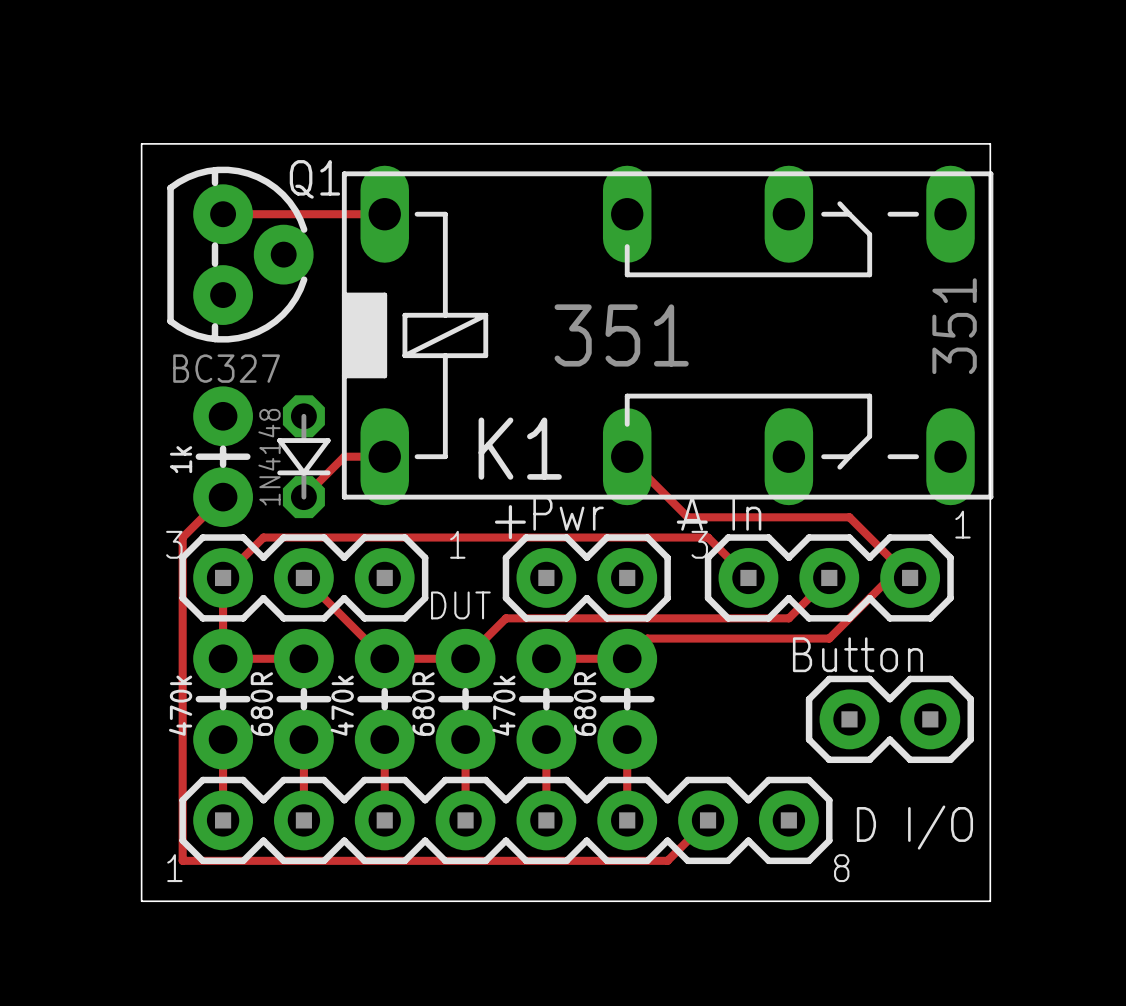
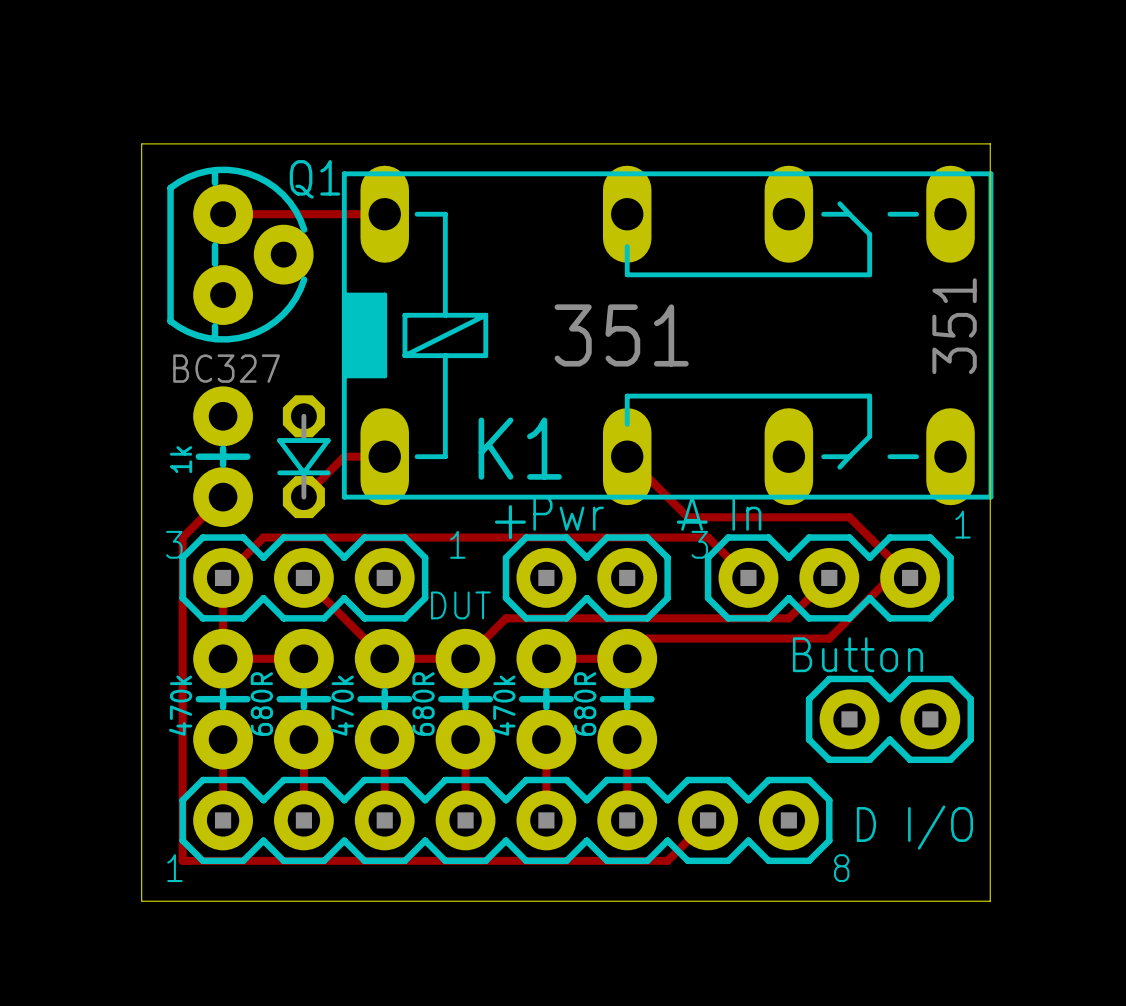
part value: 1N4148 (269, 457) -> none

